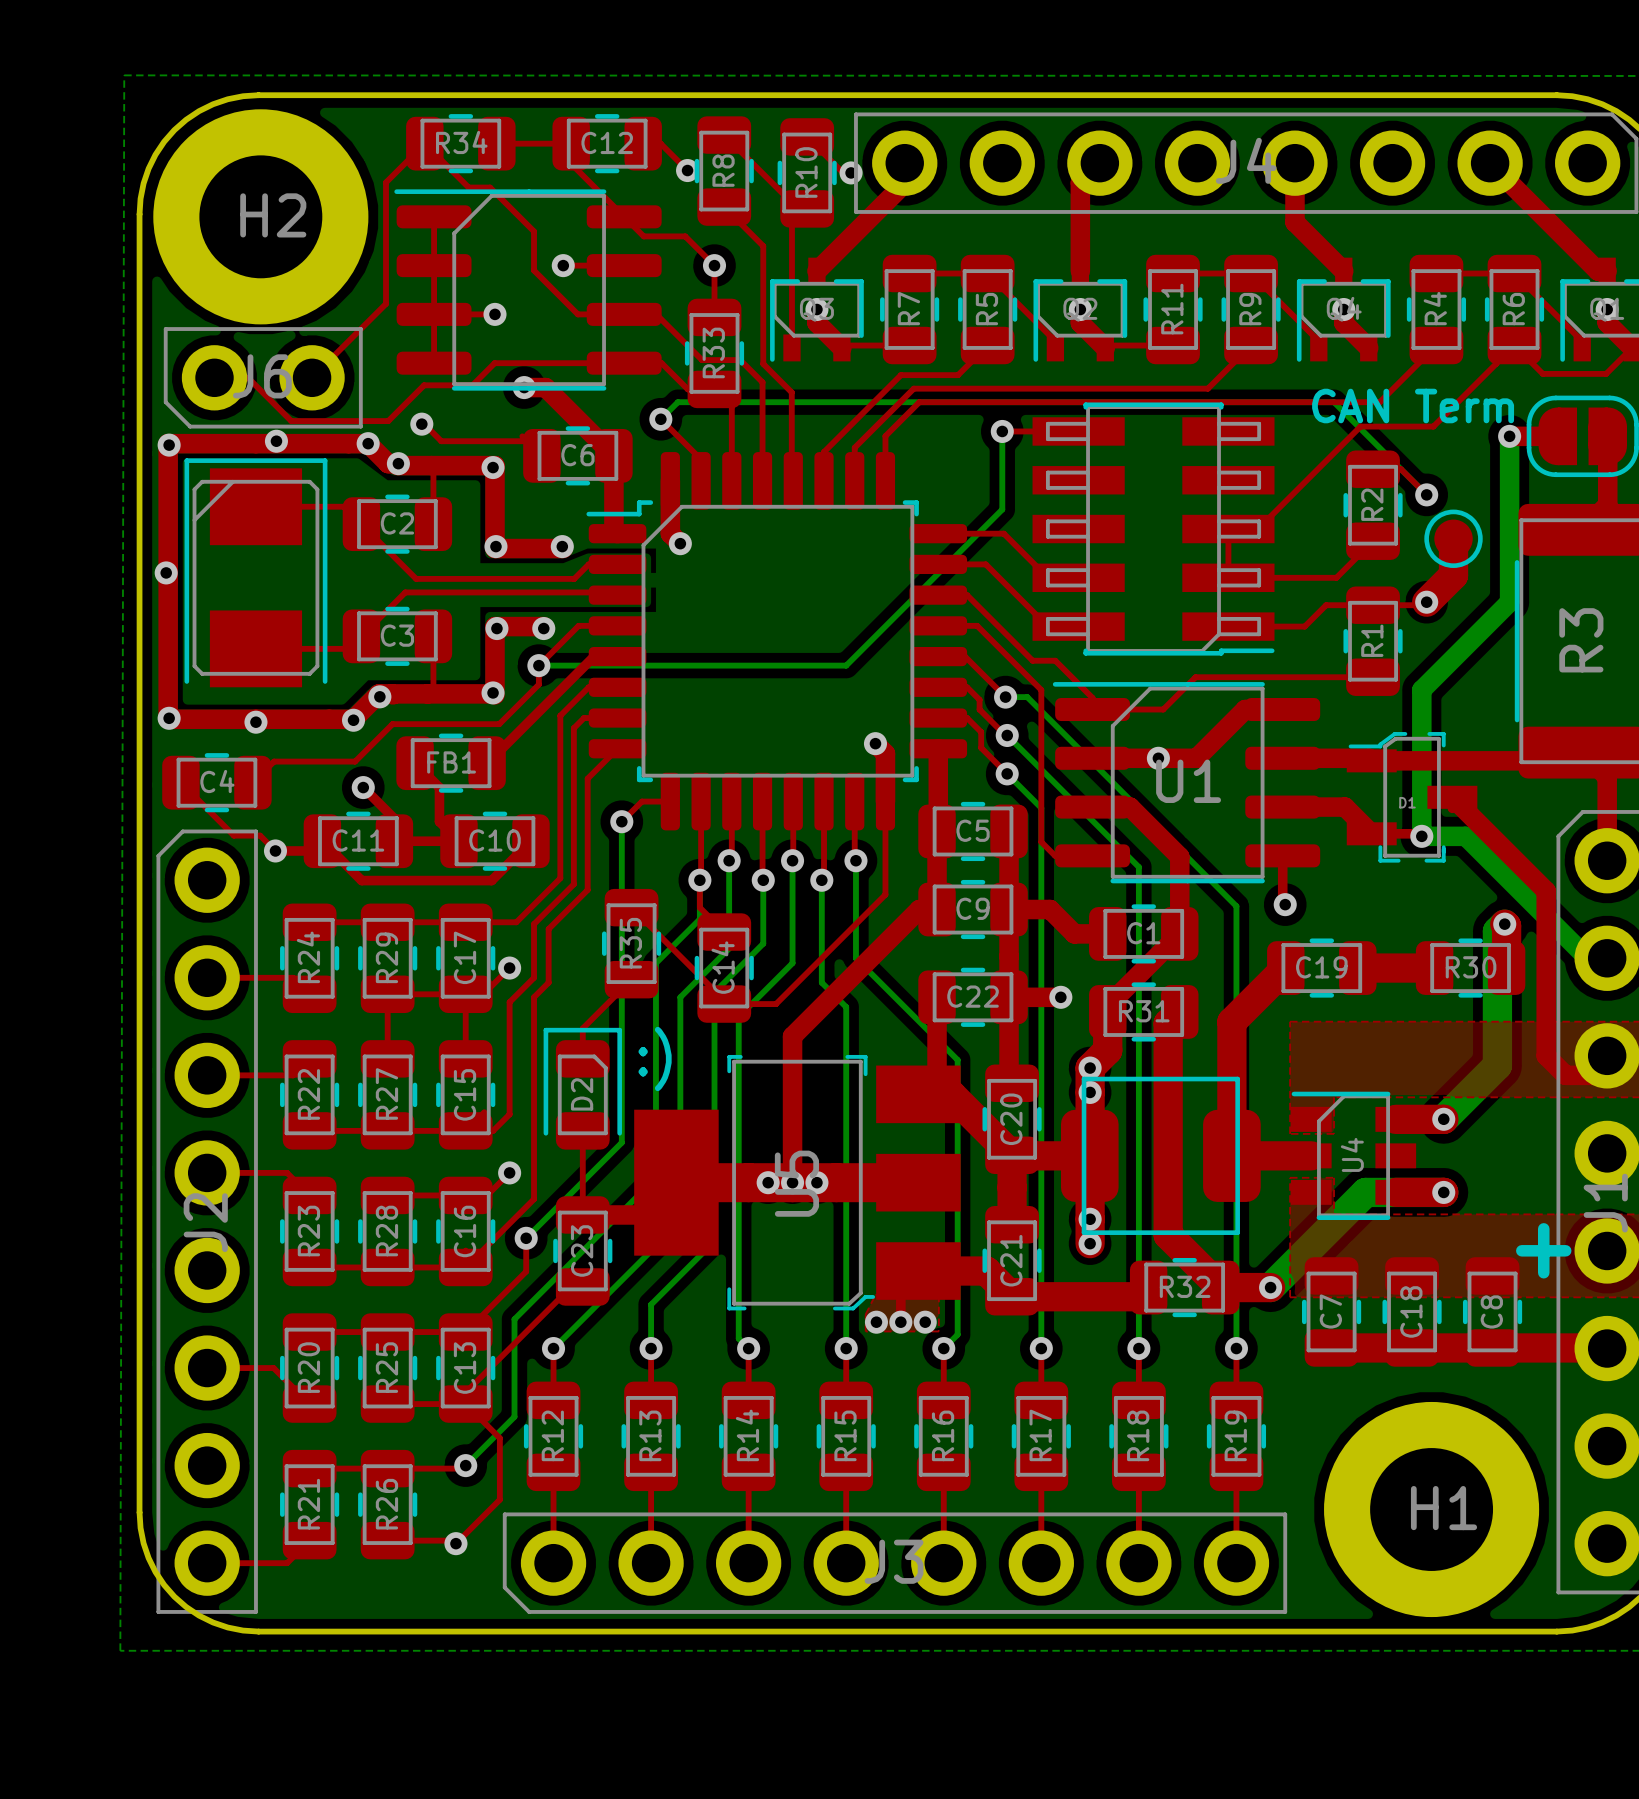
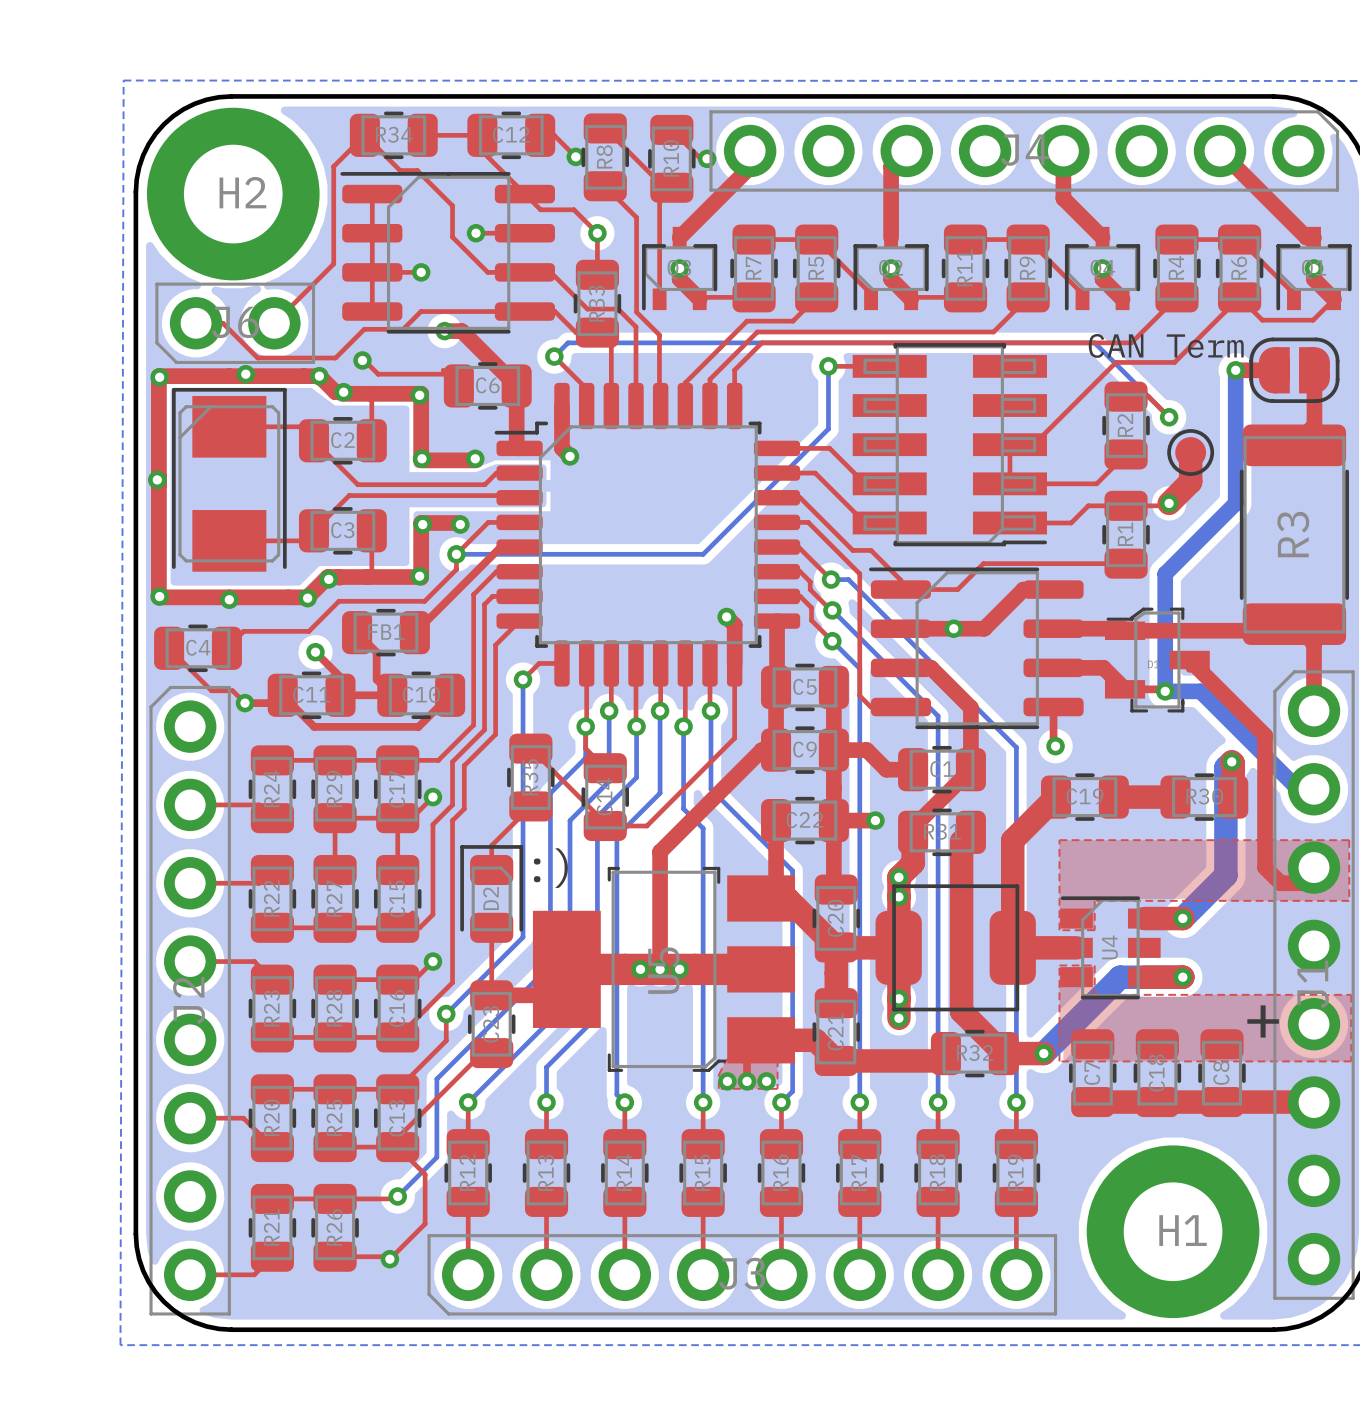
U1 name: U1 (1188, 781) -> none

